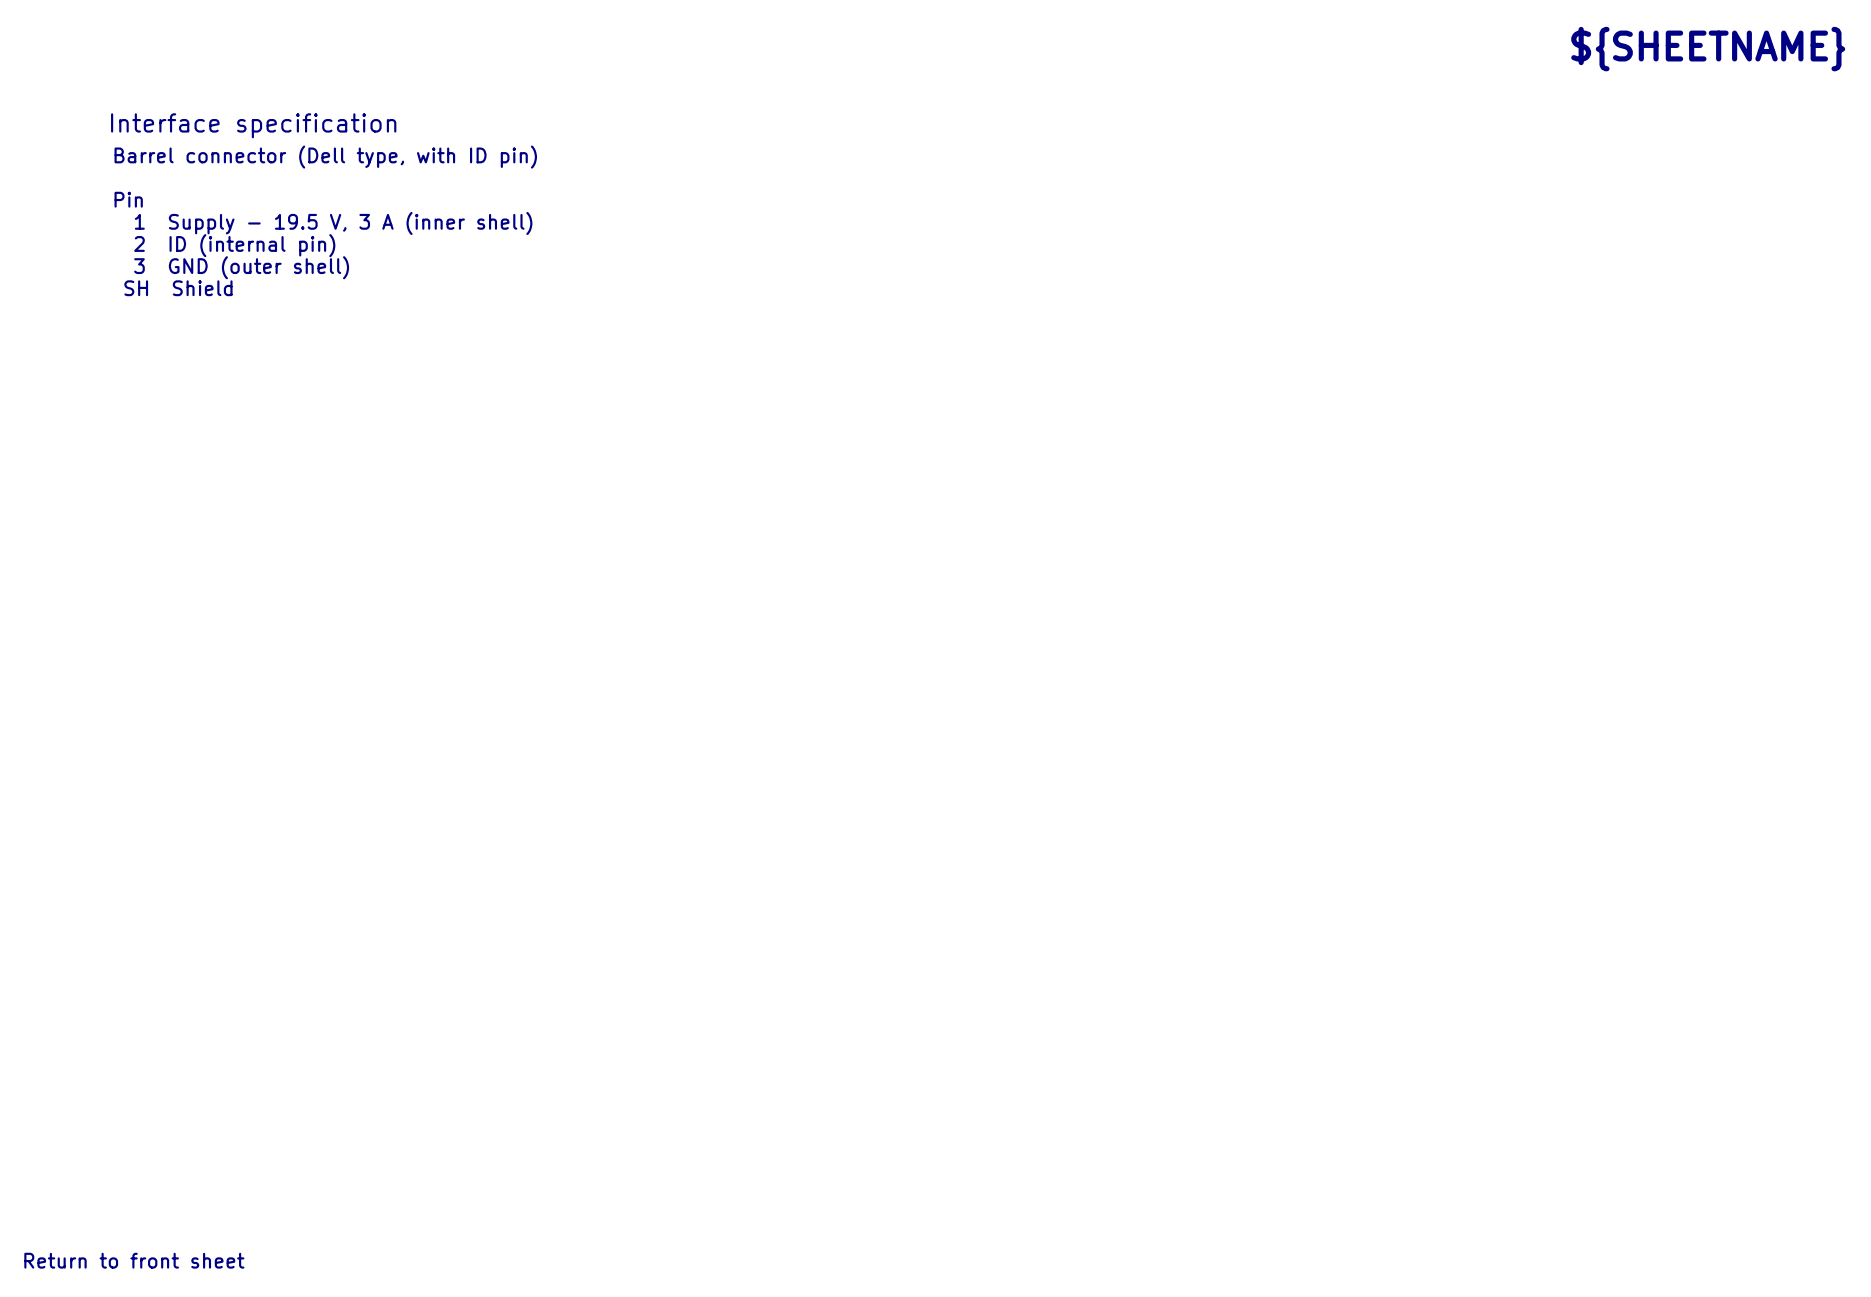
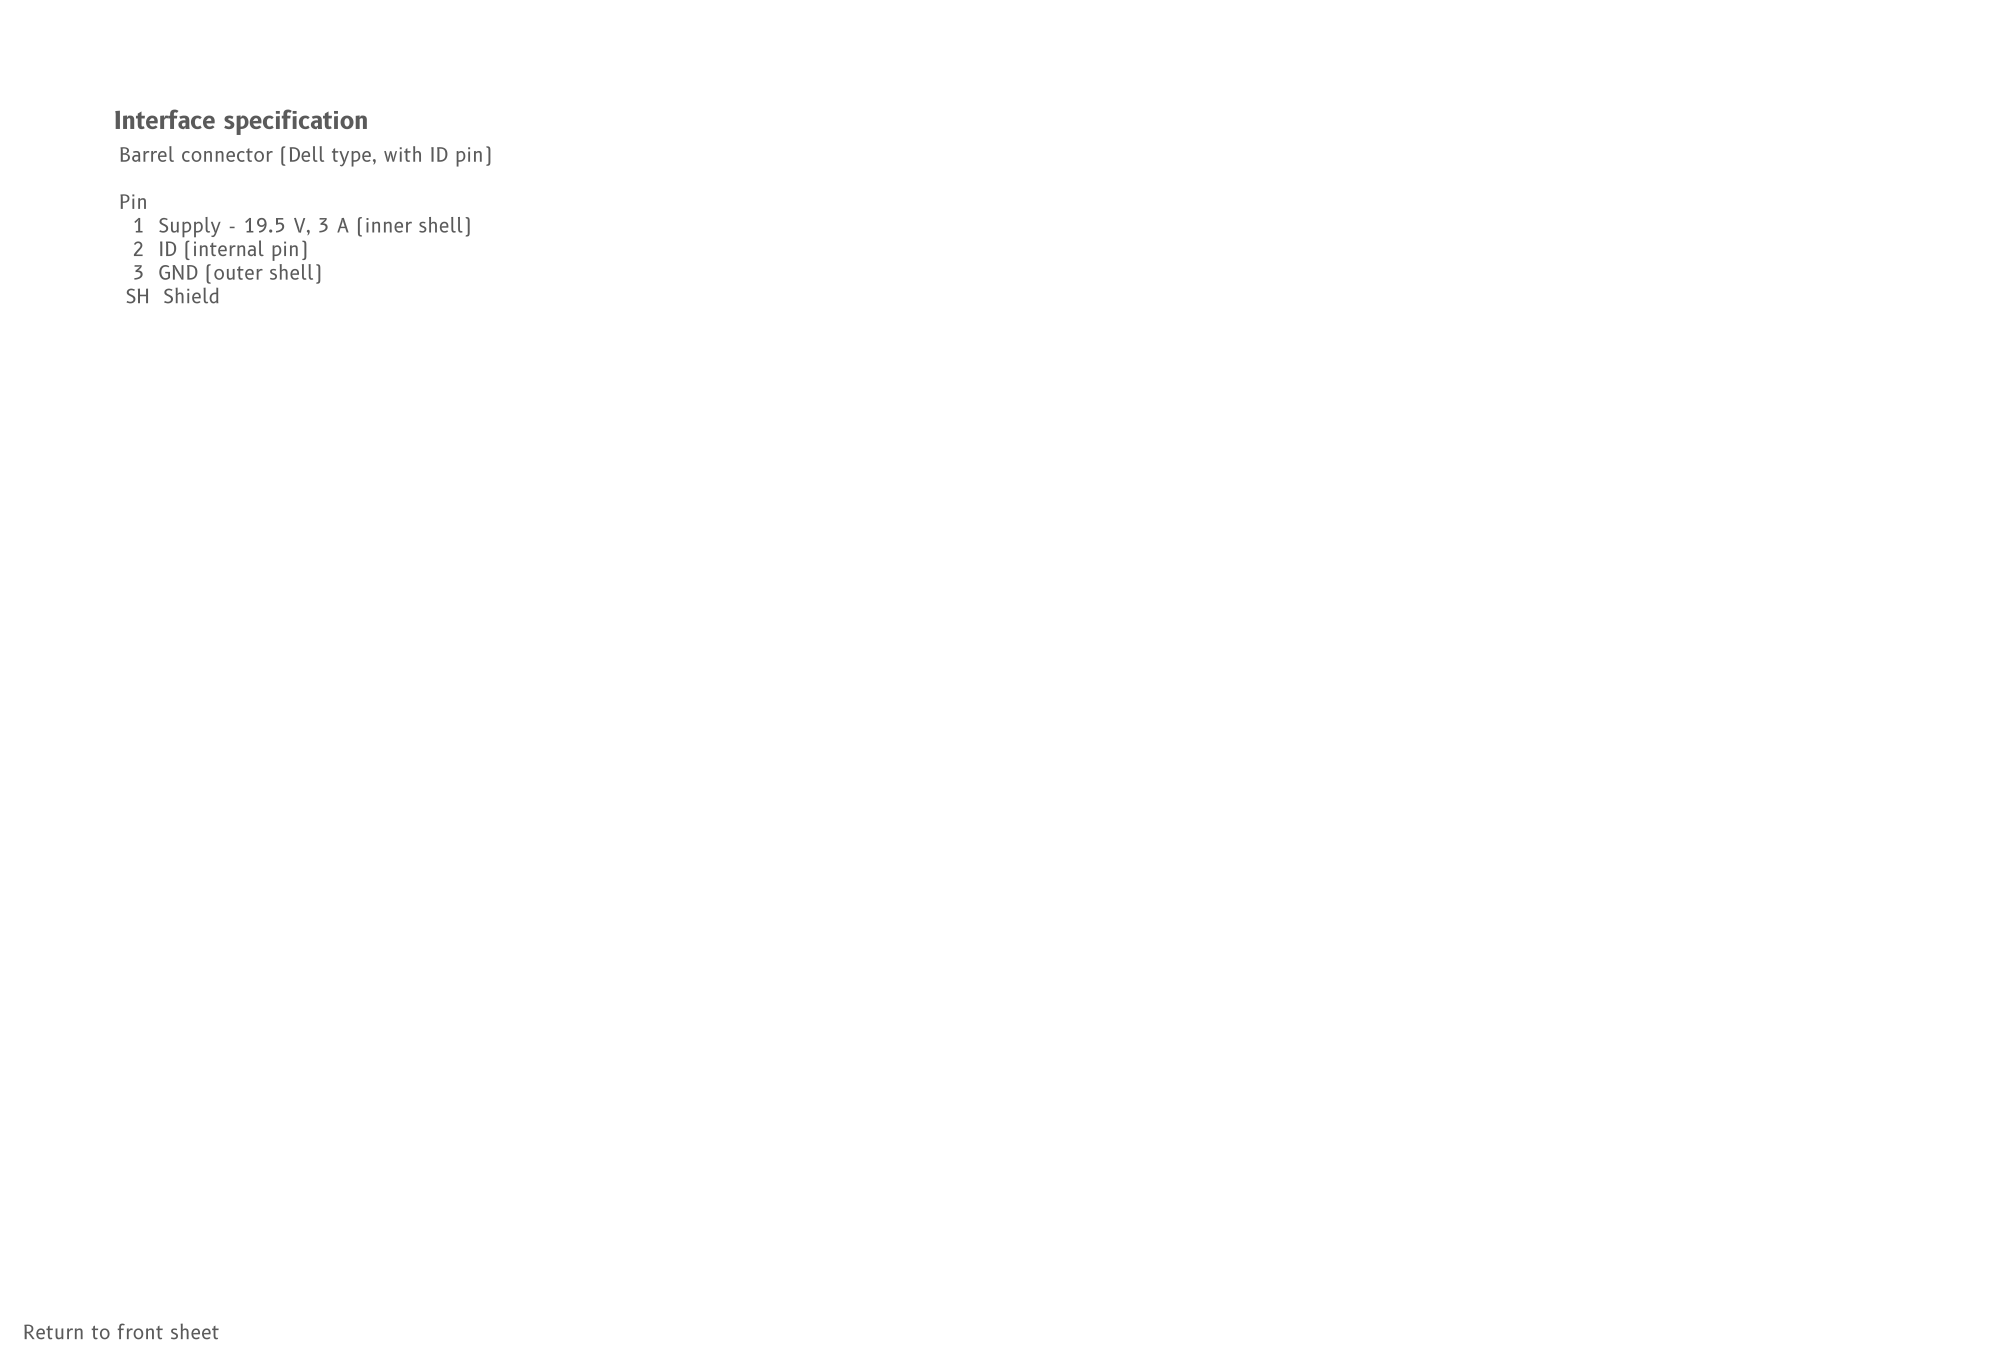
text: ${SHEETNAME} (1708, 49) -> none

